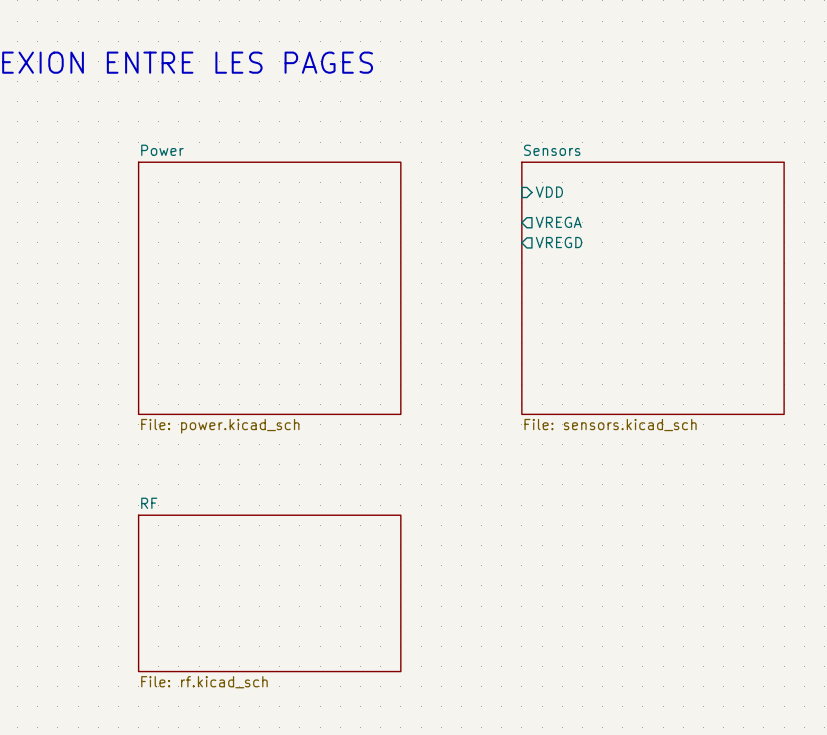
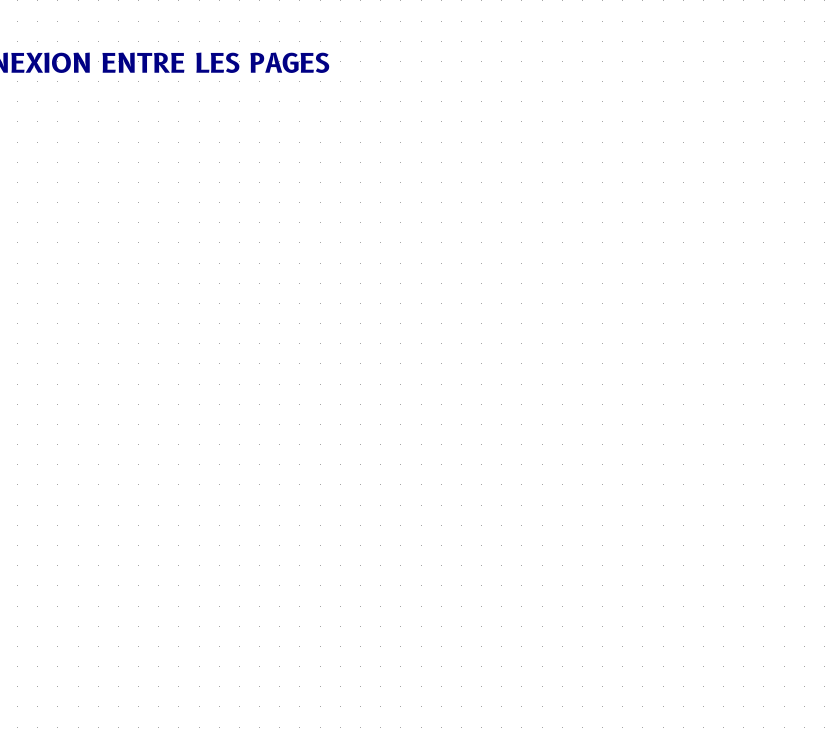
sheet pin: VDD (549, 192) -> none
sheet pin: VREGA (558, 222) -> none
sheet pin: VREGD (559, 242) -> none
sheet Power: File: power.kicad_sch (269, 288) -> none
sheet Sensors: File: sensors.kicad_sch (652, 288) -> none
sheet RF: File: rf.kicad_sch (269, 593) -> none

